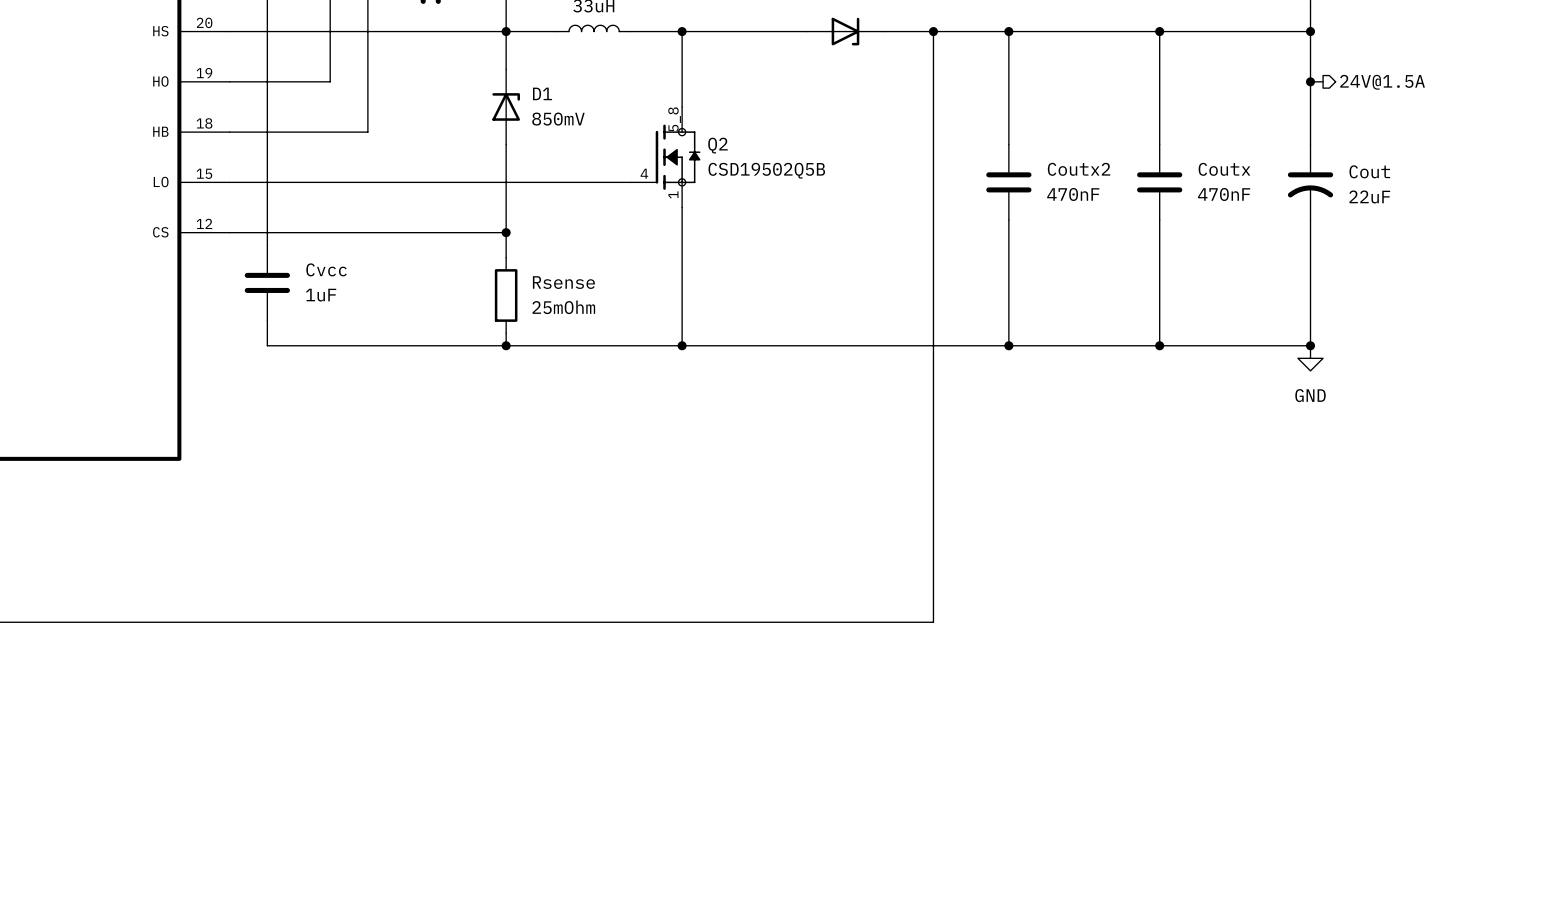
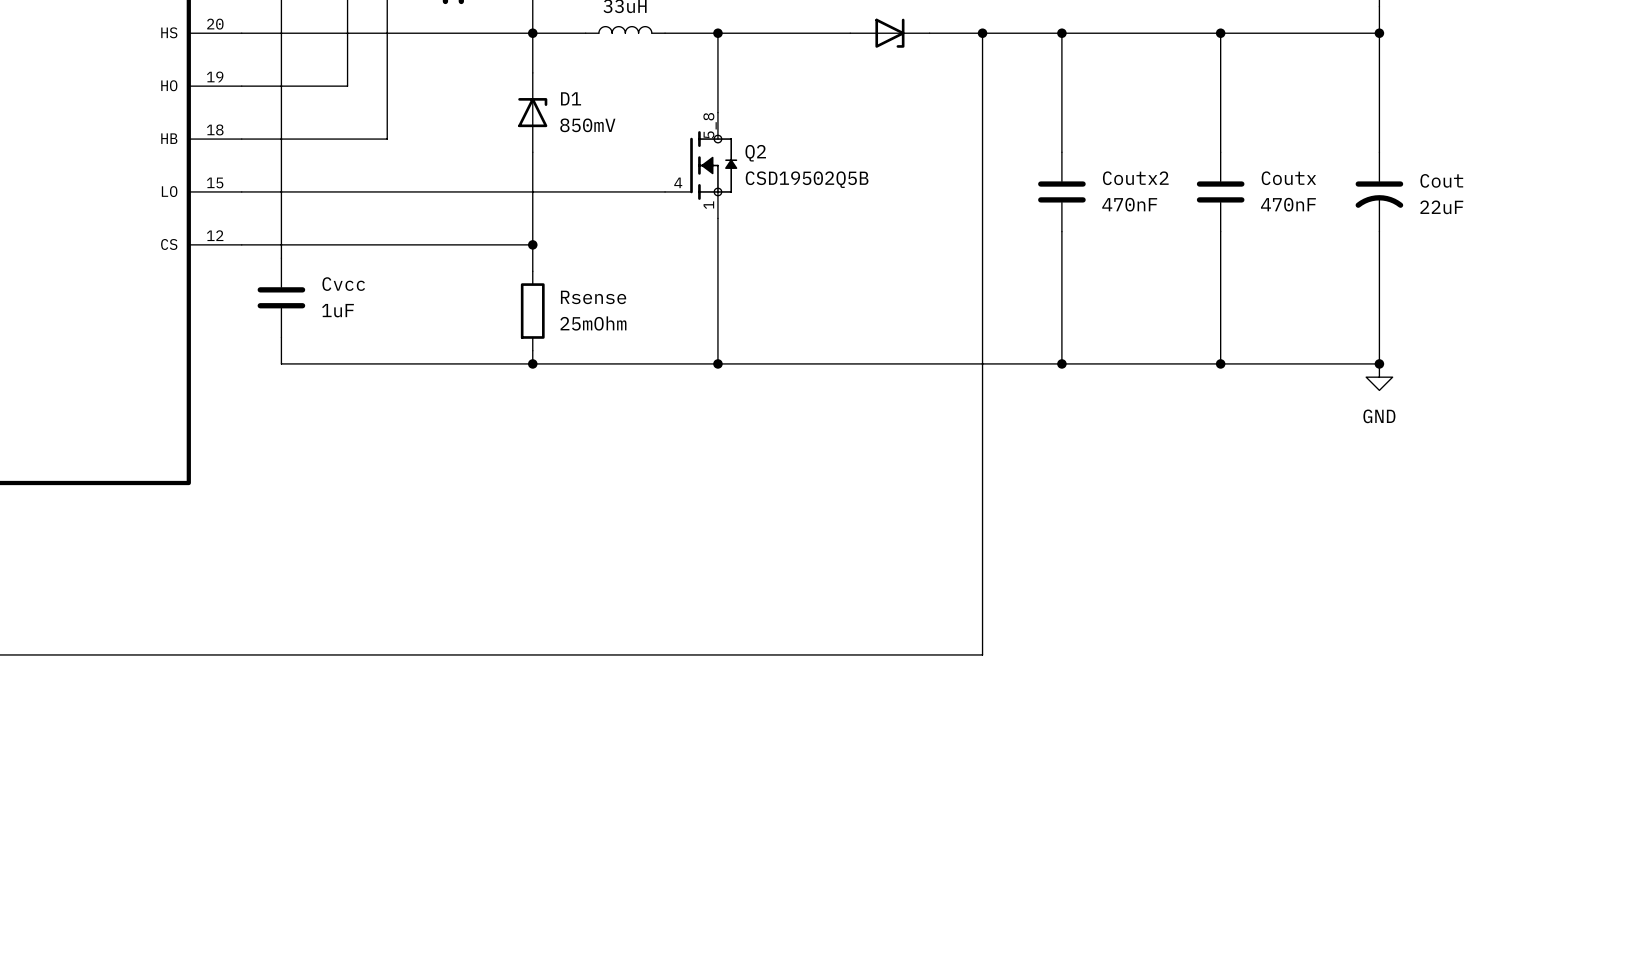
wire: (1310, 81) (1323, 81) -> none
junction: (1310, 81) -> none
hierarchical label: 24V@1.5A (1382, 82) -> none

